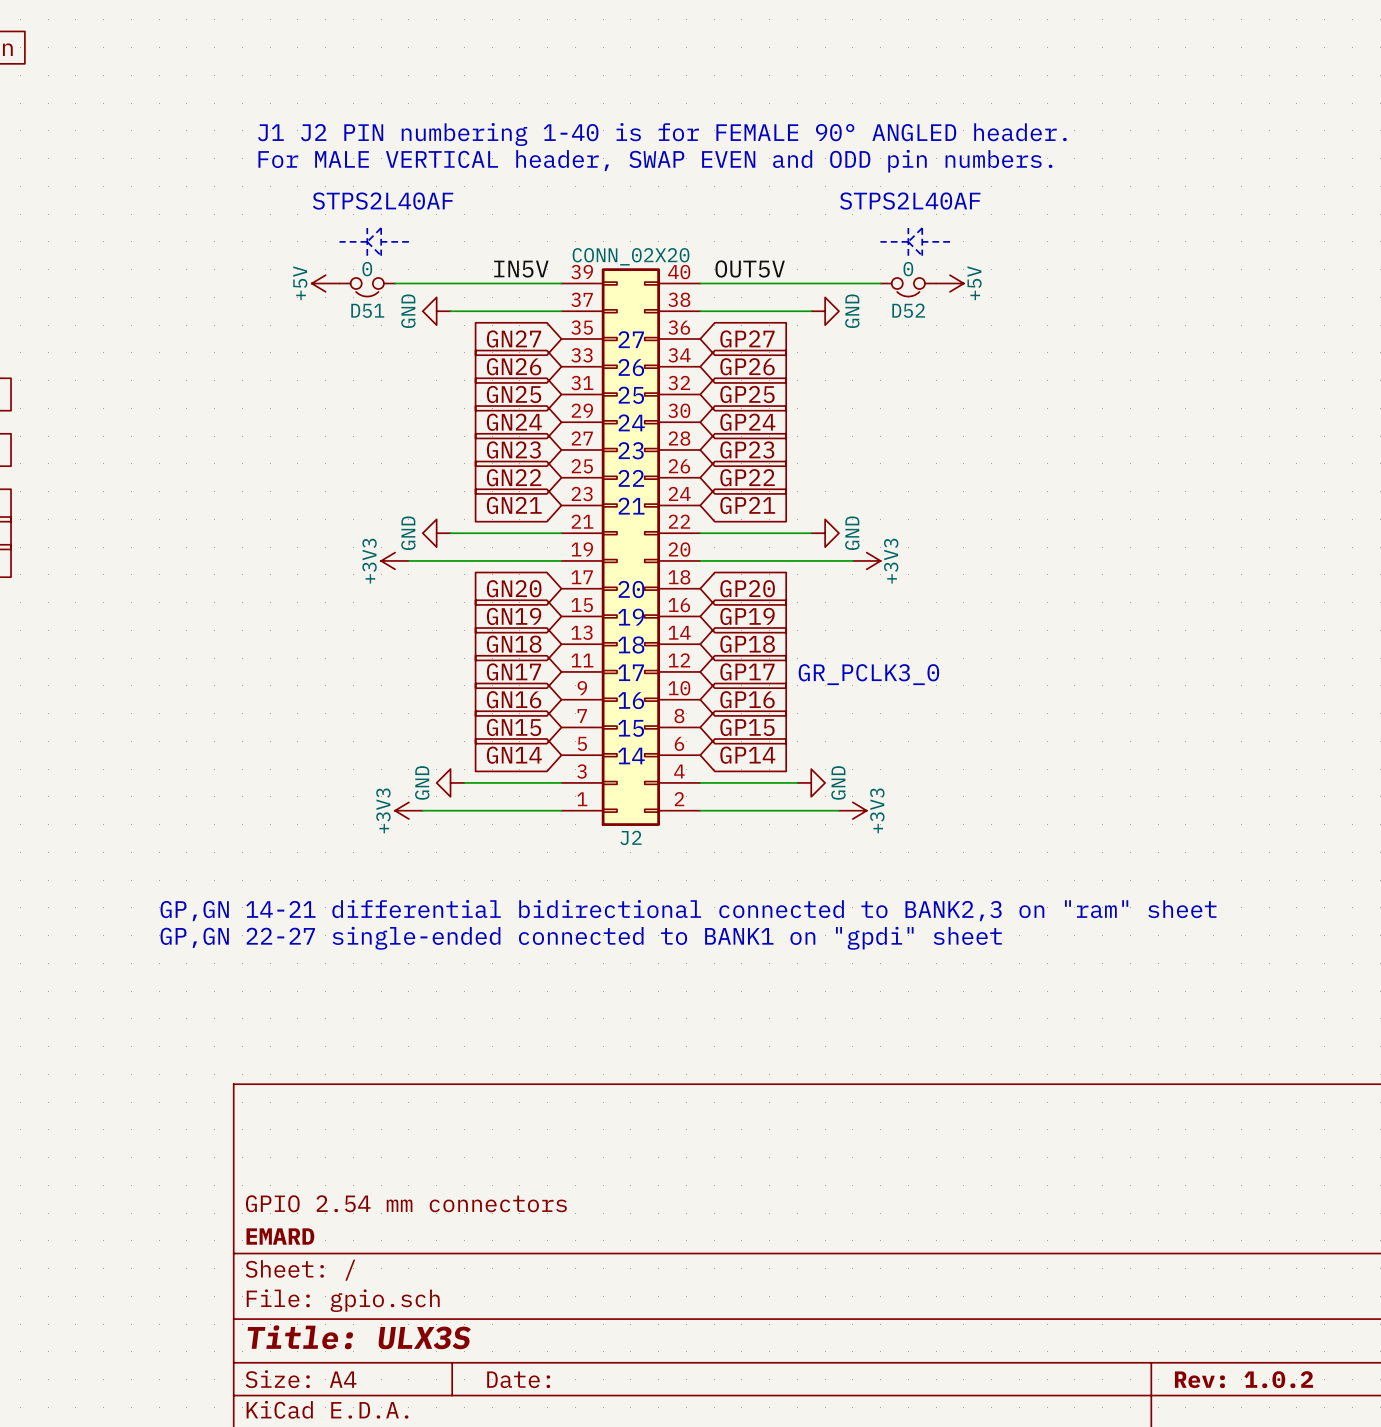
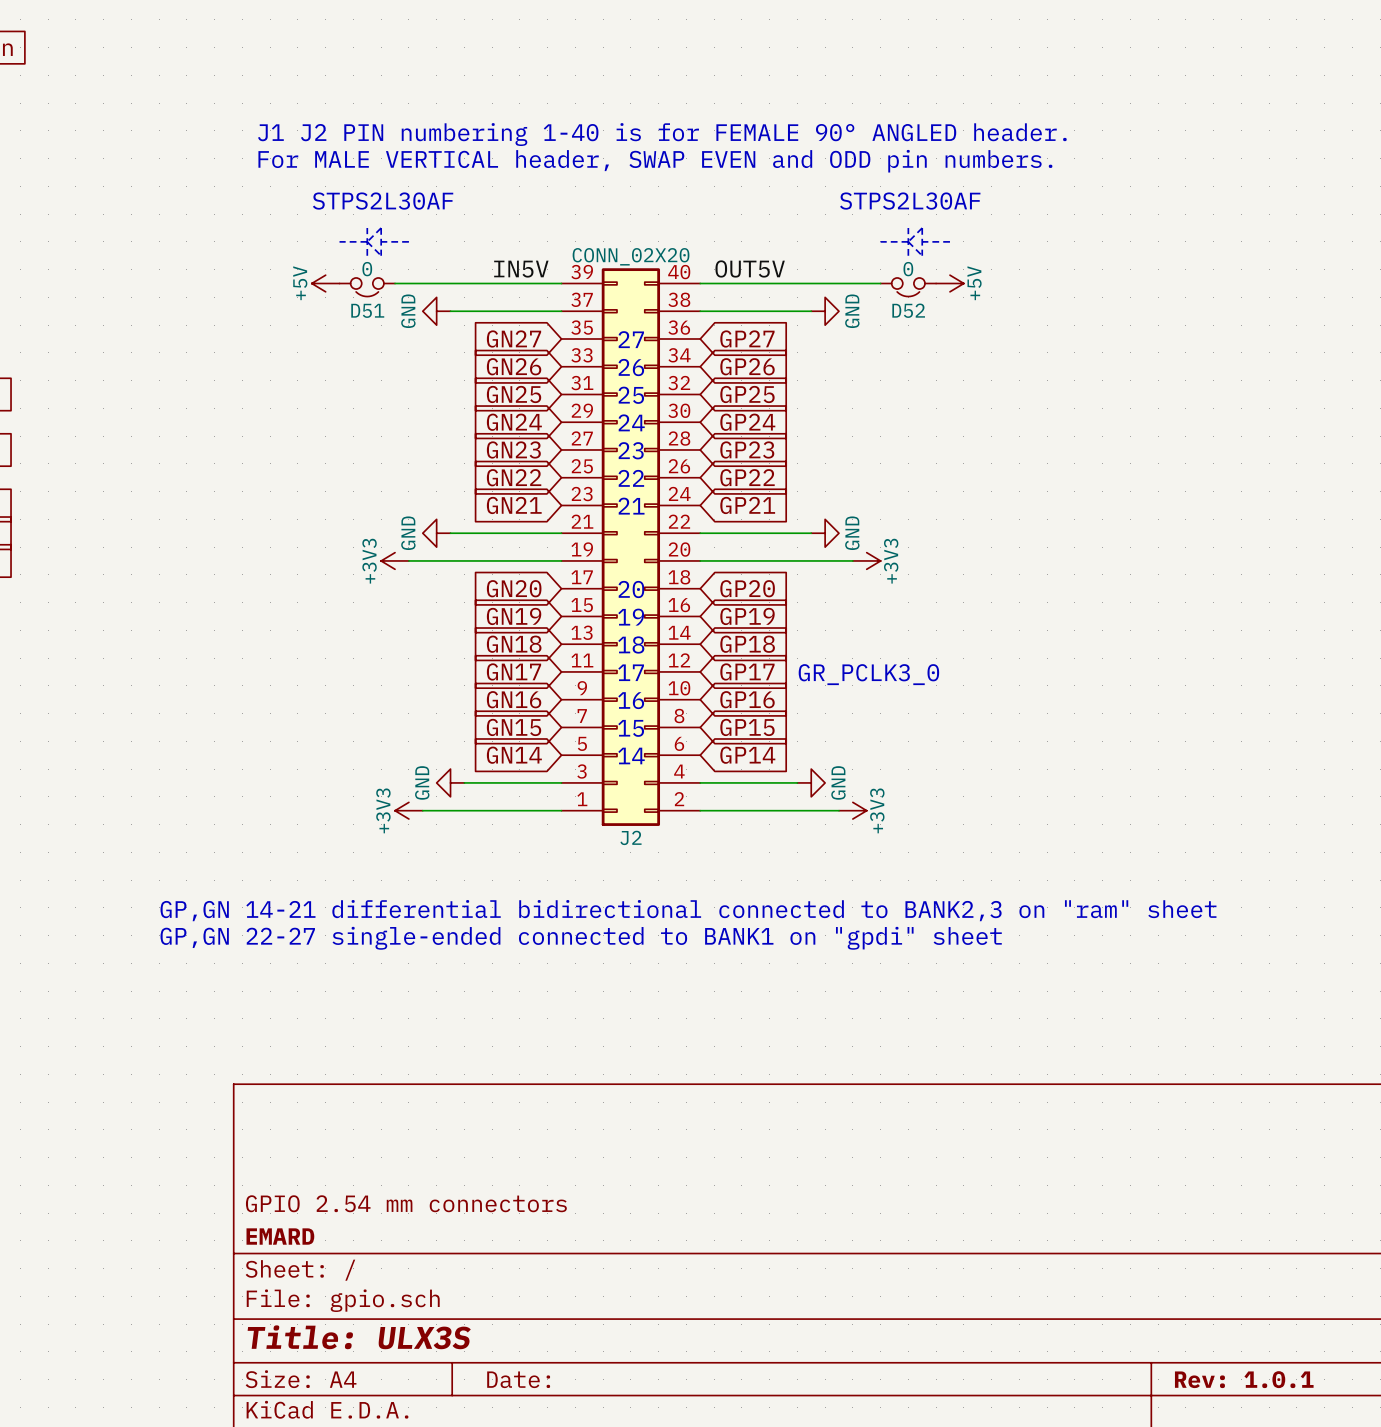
text: STPS2L40AF (383, 201) -> STPS2L30AF (383, 201)
text: STPS2L40AF (910, 201) -> STPS2L30AF (910, 201)
title block: Rev: 1.0.2 (1243, 1379) -> Rev: 1.0.1 (1244, 1379)

